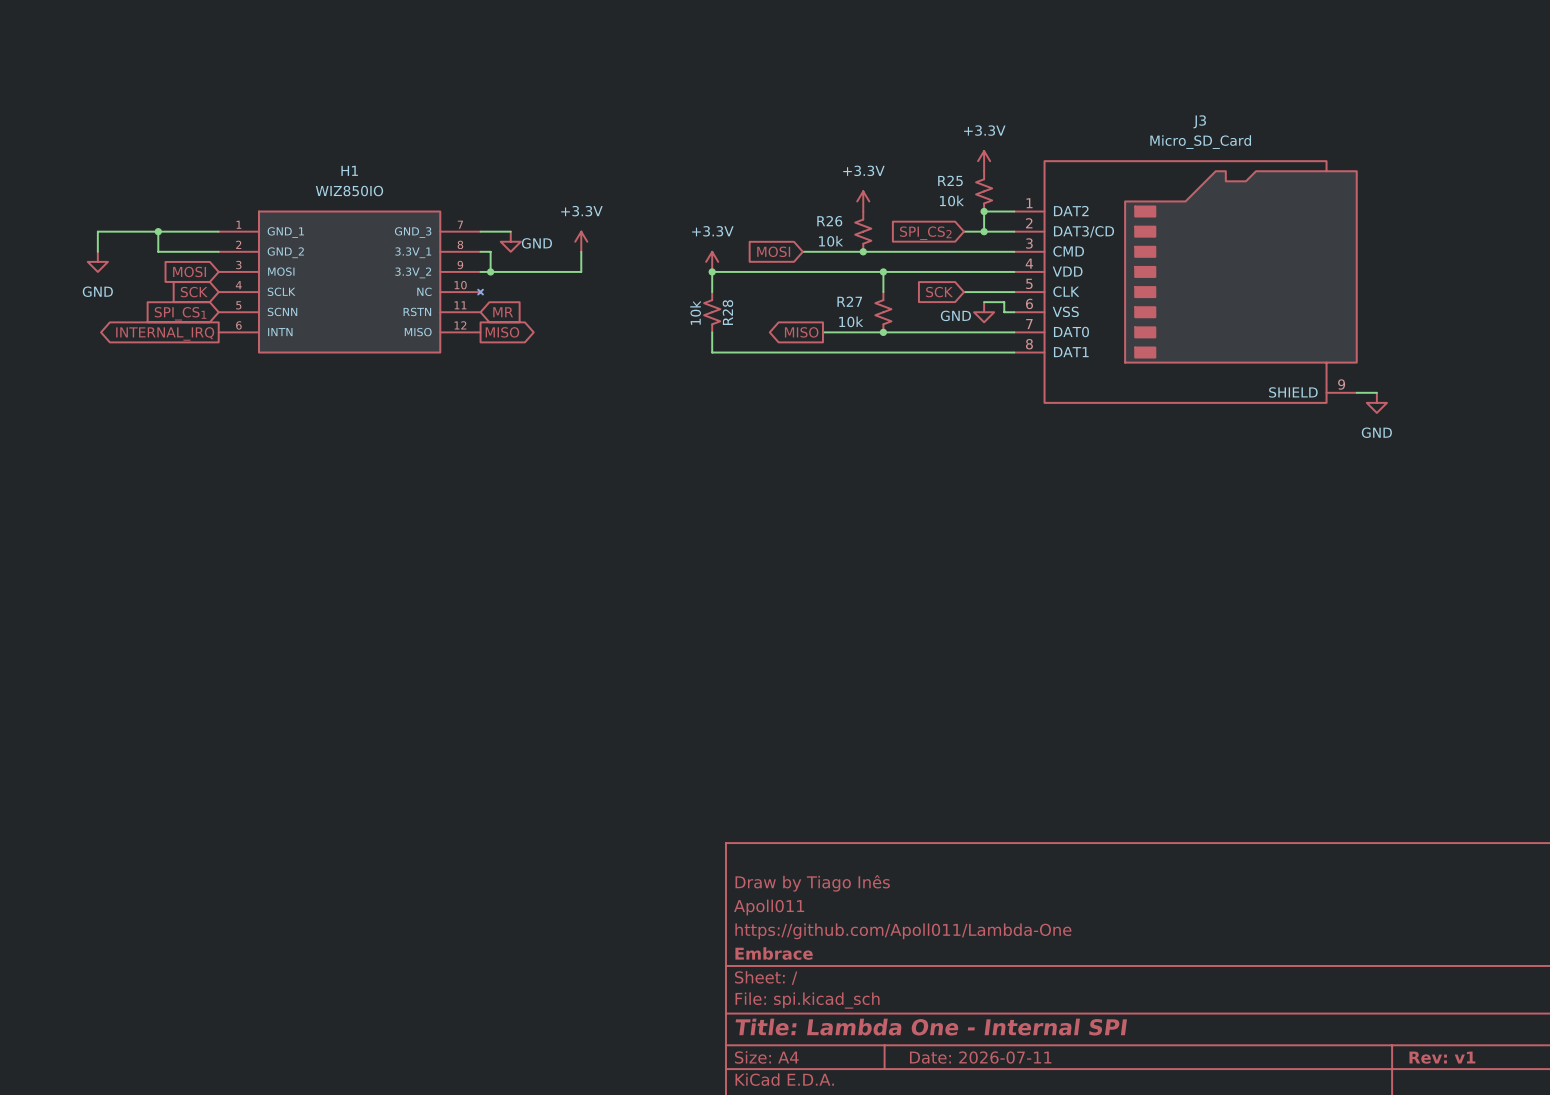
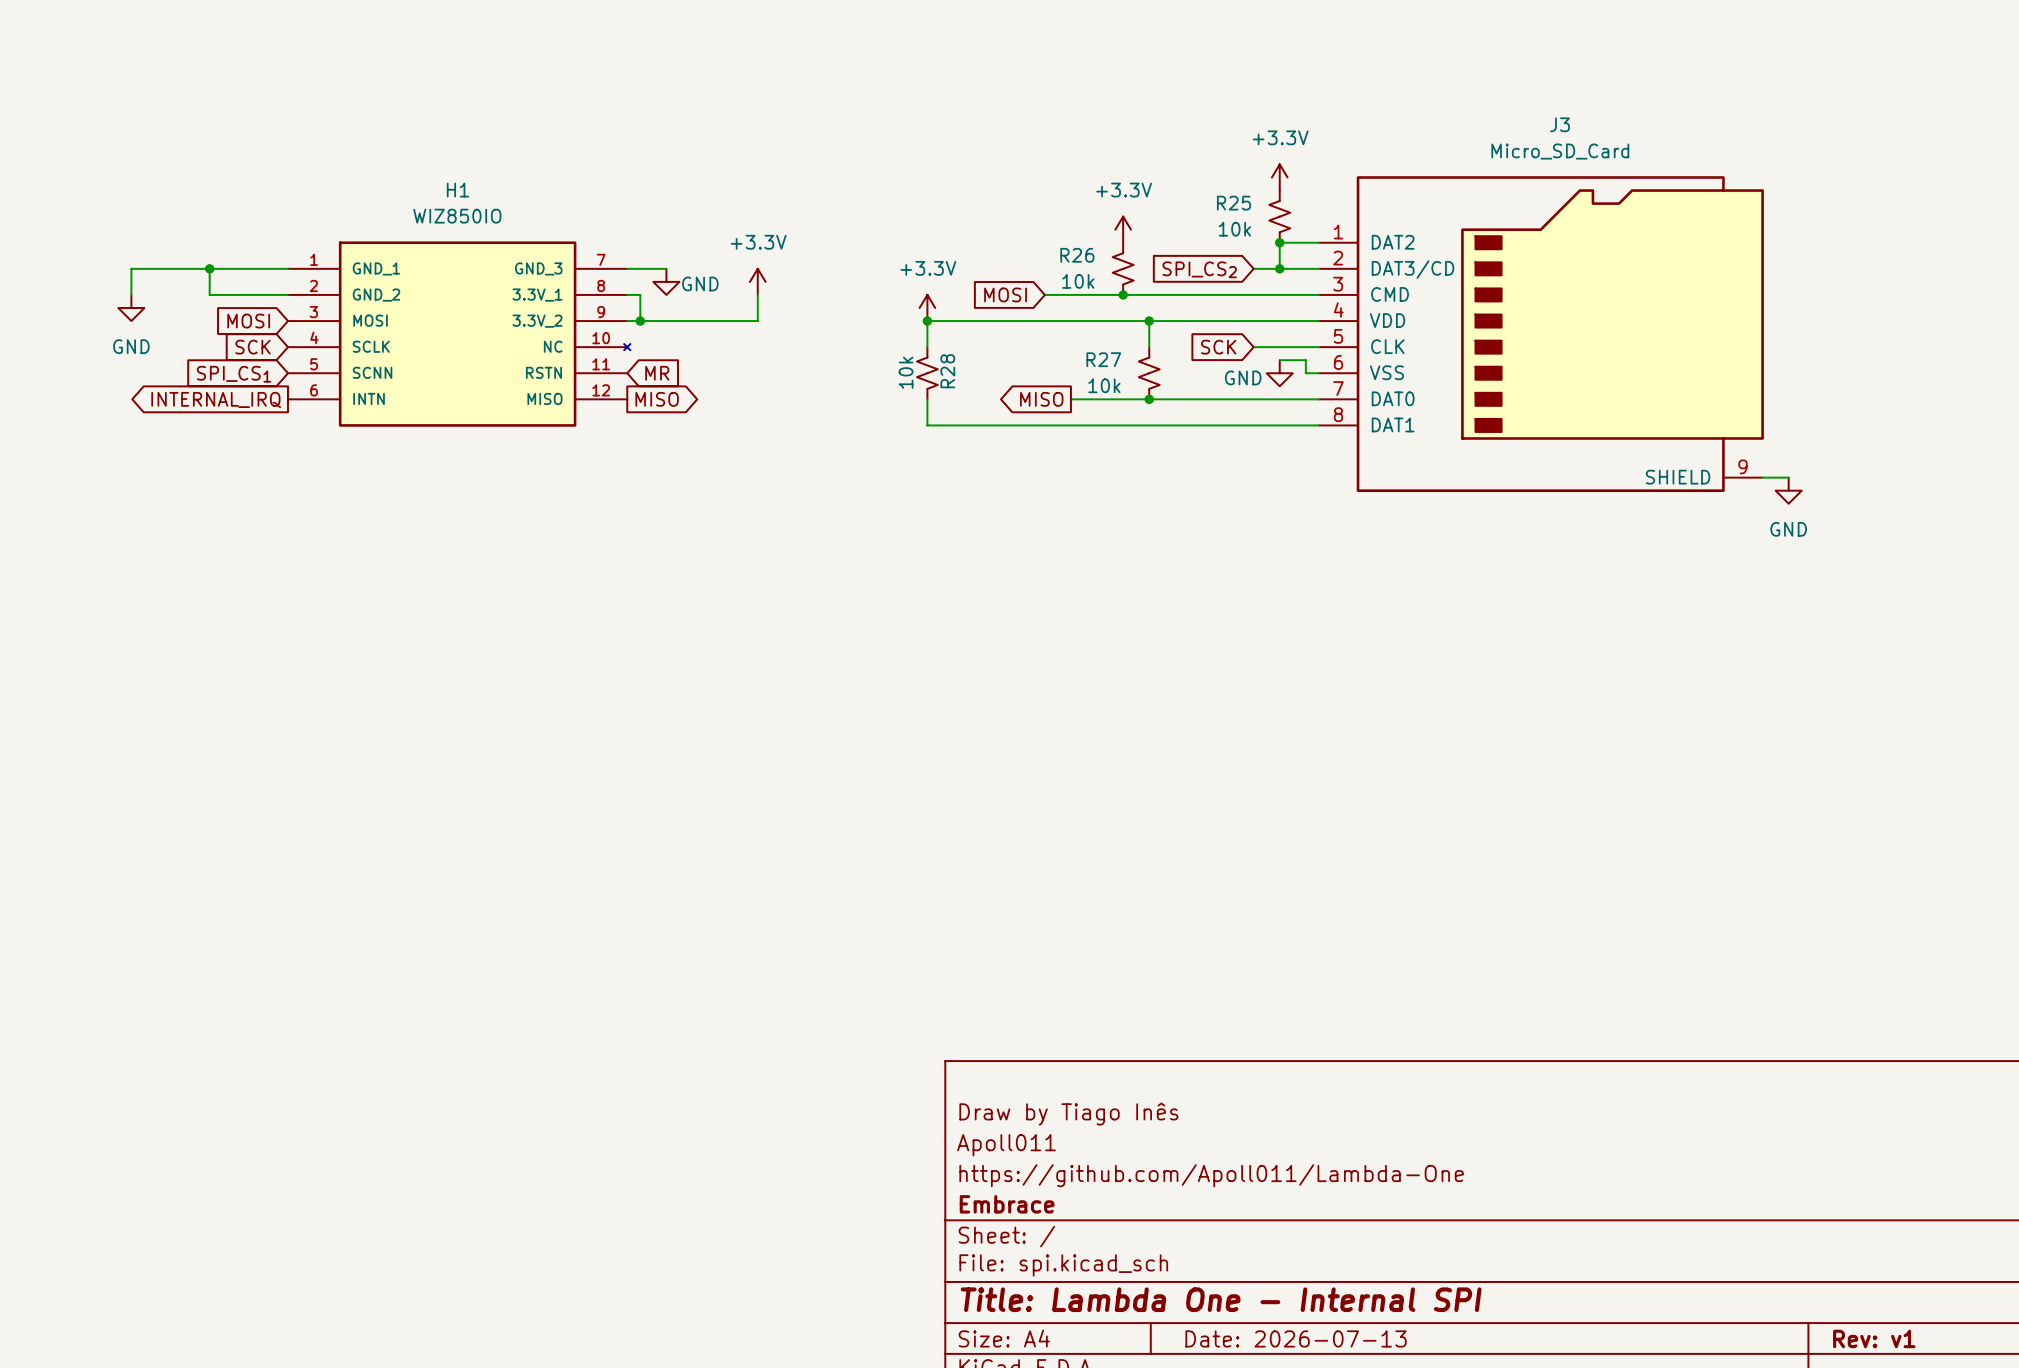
title block: Date: 2026-07-11 (980, 1057) -> Date: 2026-07-13 (1296, 1338)

